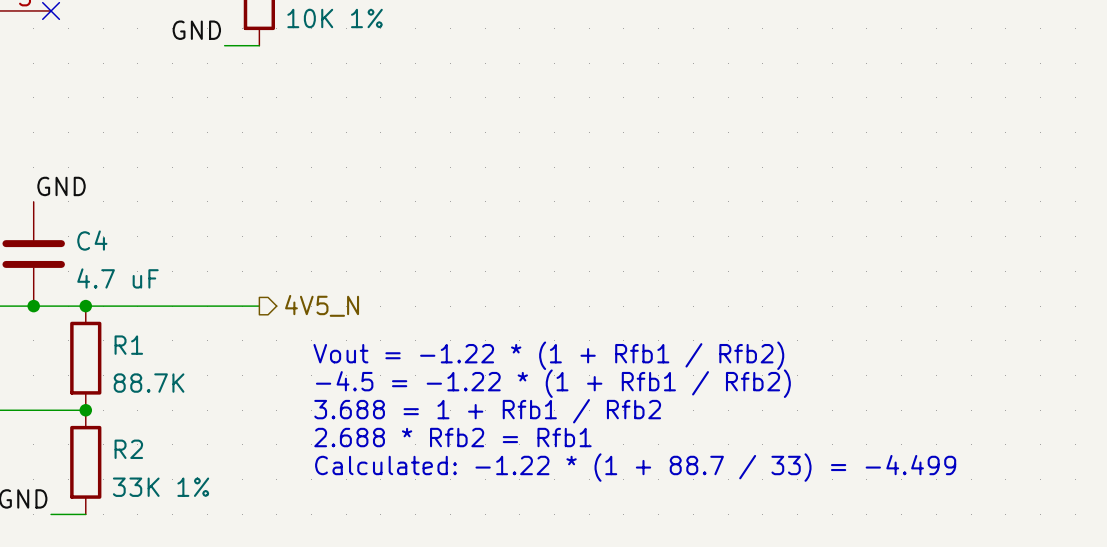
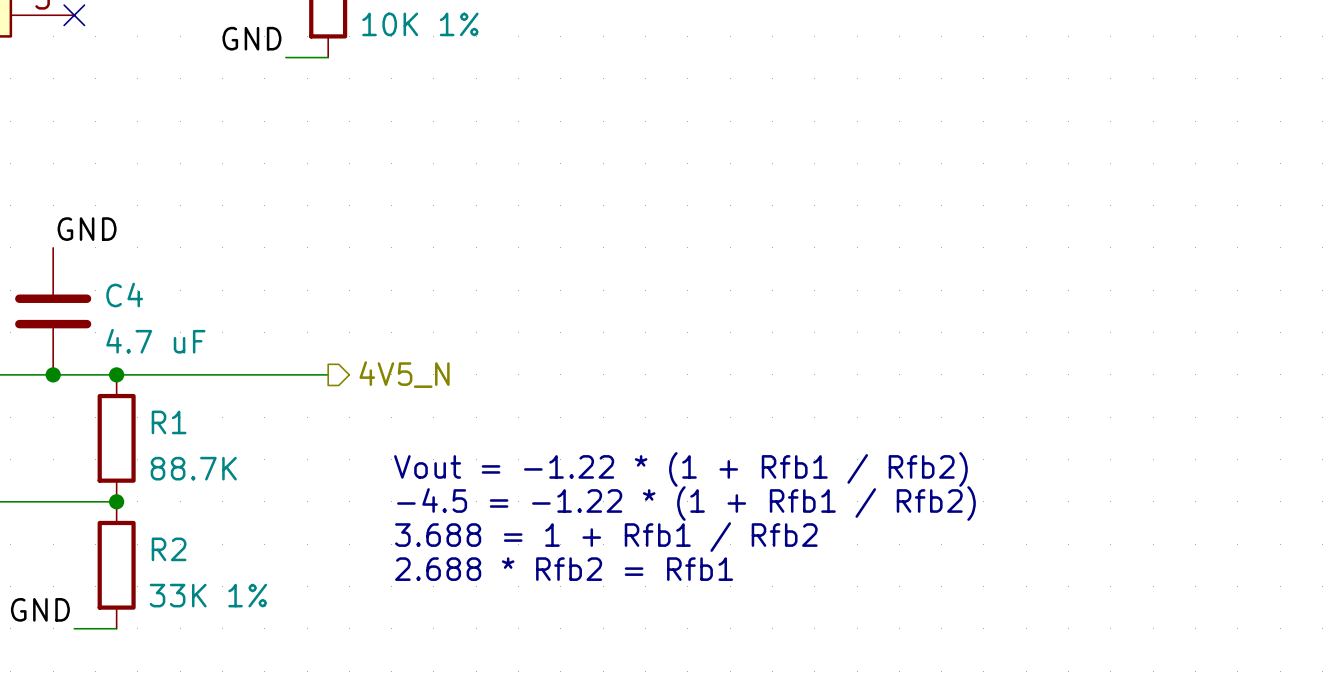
text: Vout = -1.22 * (1 + Rfb1 / Rfb2) (548, 355) -> none
text: -4.5 = -1.22 * (1 + Rfb1 / Rfb2) (553, 383) -> Vout = -1.22 * (1 + Rfb1 / Rfb2) (680, 469)
text: 3.688 = 1 + Rfb1 / Rfb2 (487, 411) -> -4.5 = -1.22 * (1 + Rfb1 / Rfb2) (686, 503)
text: 2.688 * Rfb2 = Rfb1 (452, 437) -> 3.688 = 1 + Rfb1 / Rfb2 (606, 537)
text: Calculated: -1.22 * (1 + 88.7 / 33) = -4.499 (635, 467) -> 2.688 * Rfb2 = Rfb1 (564, 569)

